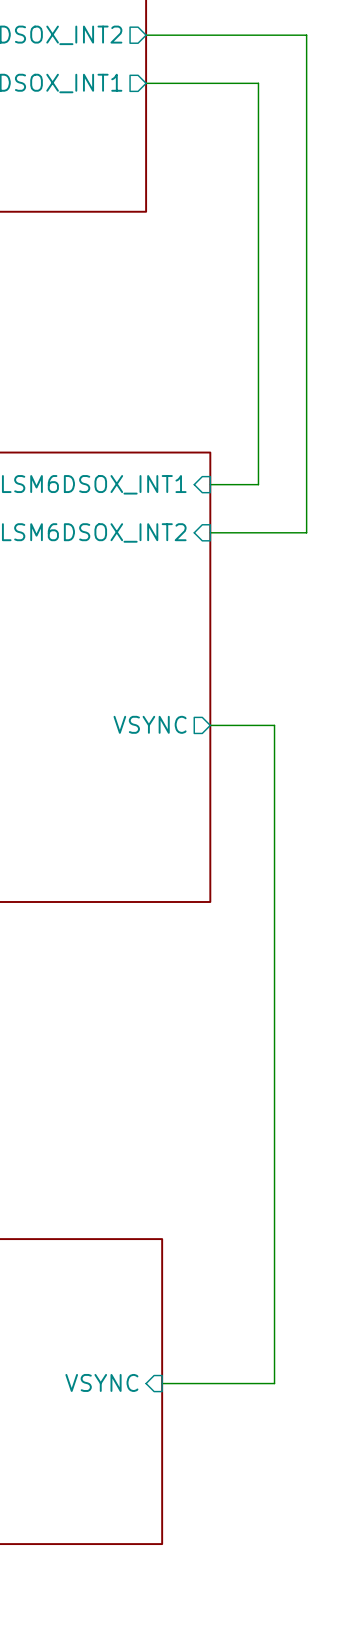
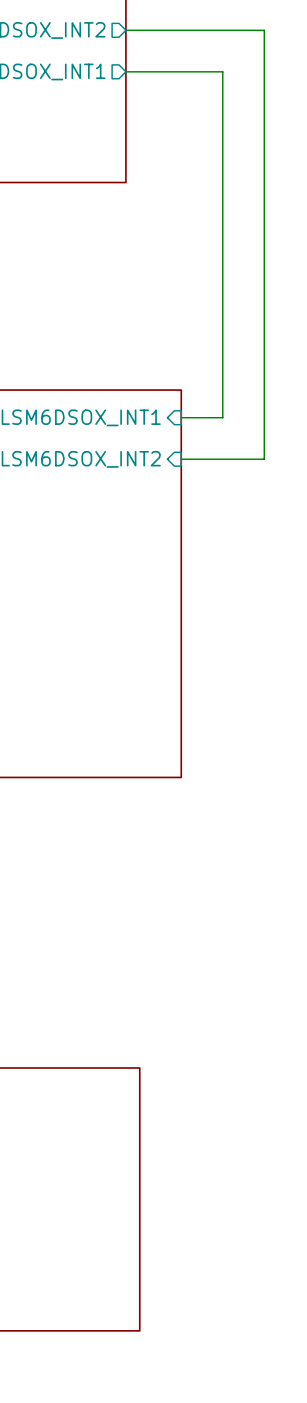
sheet pin: VSYNC (150, 724) -> none
wire: (210, 725) (274, 725) (274, 1383) (162, 1383) -> none
sheet pin: VSYNC (101, 1382) -> none

